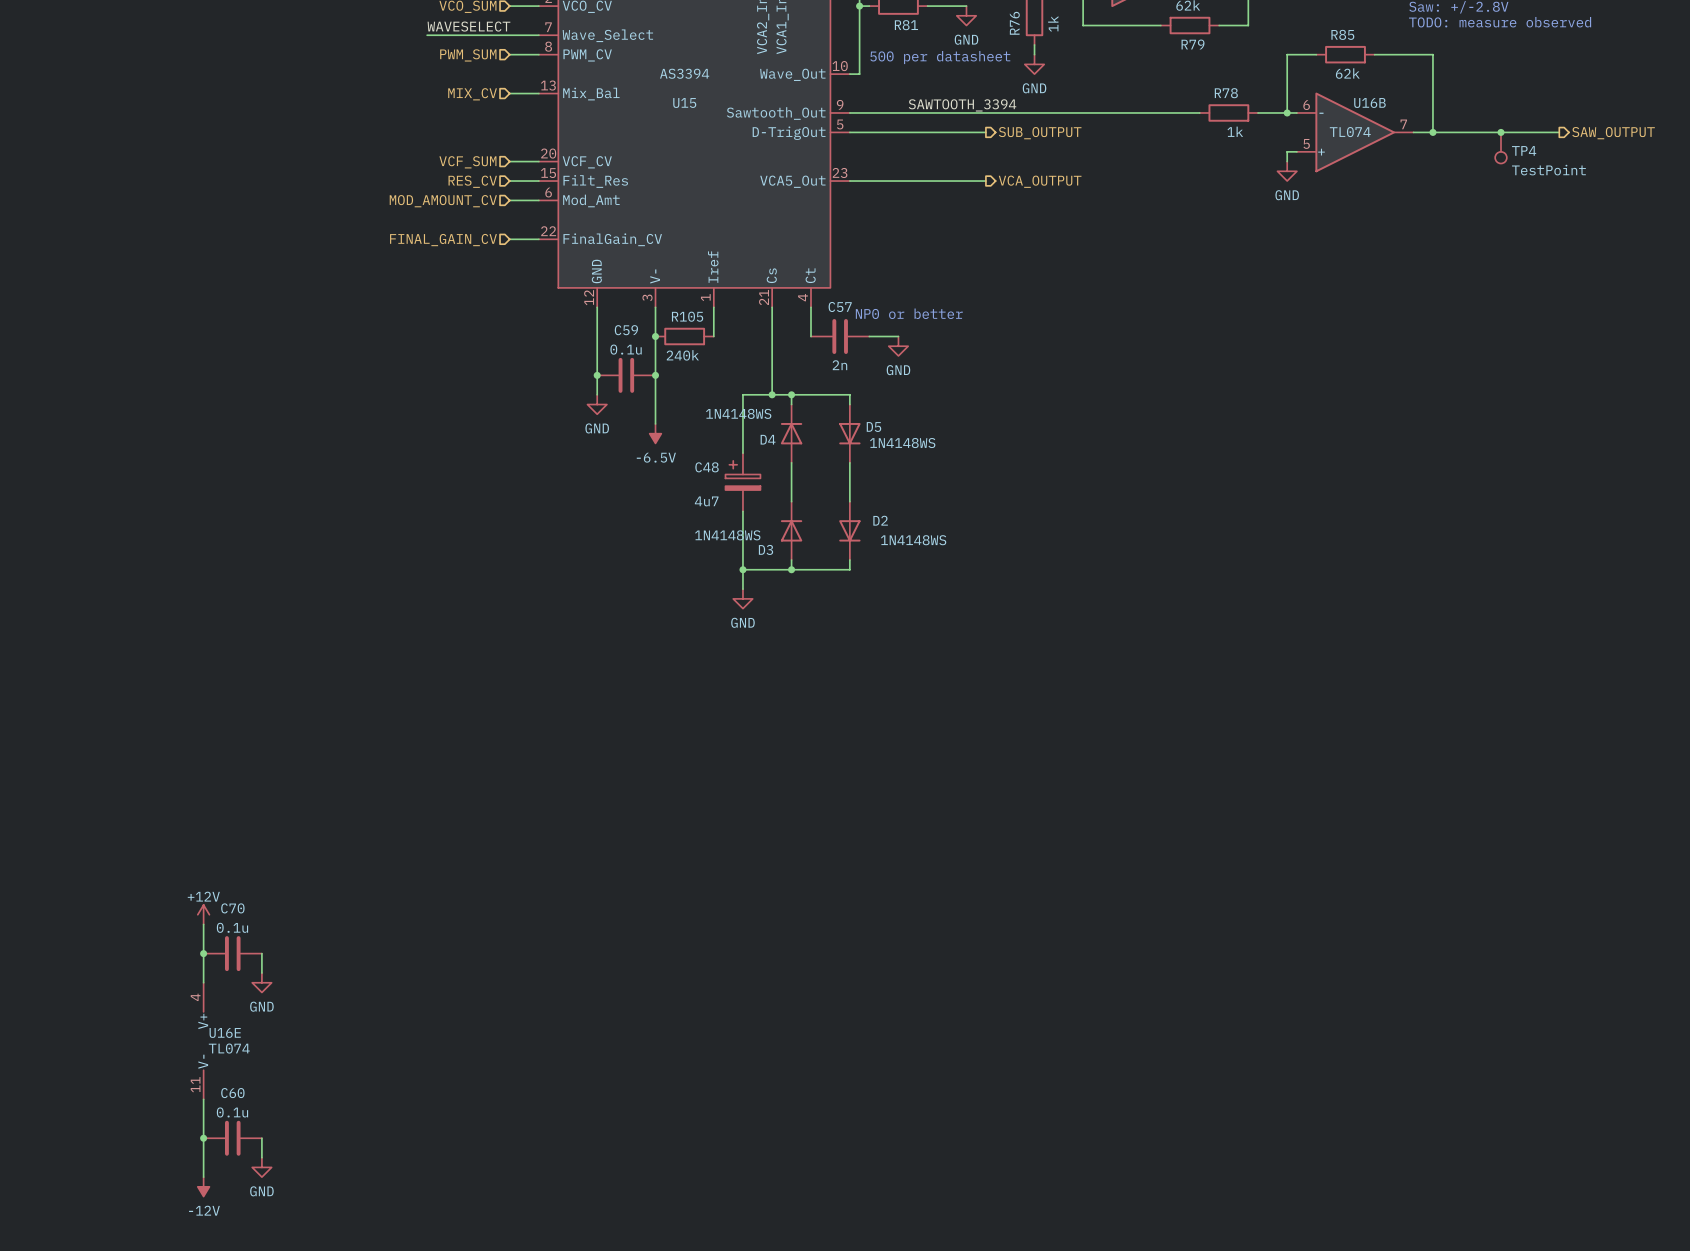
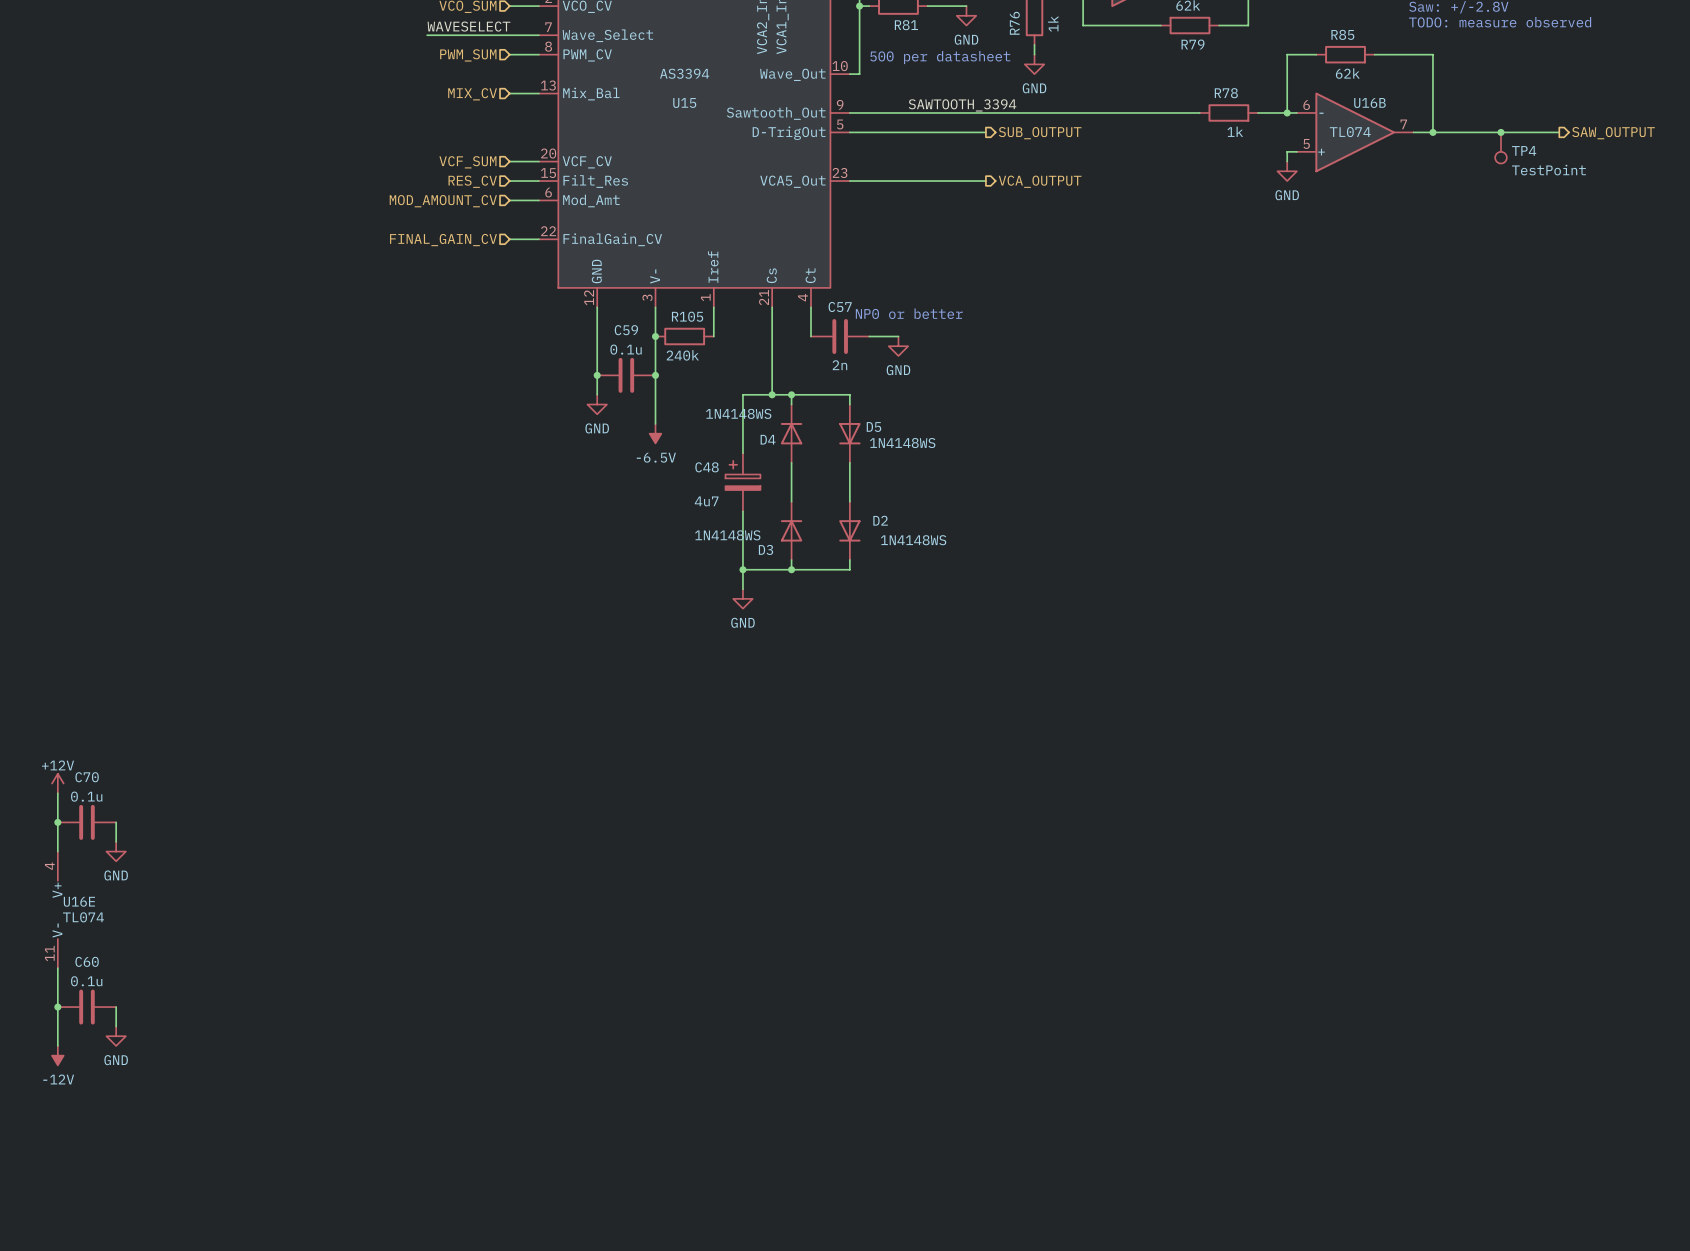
power symbol: none -> +12V (57, 783)
wire: none -> (57, 793) (57, 851)
junction: none -> (57, 822)
wire: none -> (116, 822) (116, 841)
power symbol: none -> GND (116, 851)
power symbol: +12V (203, 914) -> none
wire: (203, 924) (203, 982) -> none
junction: (203, 953) -> none
C70 position: (232, 953) -> (86, 822)
wire: (261, 953) (261, 973) -> (116, 1007) (116, 1026)
wire: none -> (57, 968) (57, 1045)
power symbol: GND (261, 982) -> none
junction: none -> (57, 1007)
power symbol: none -> GND (116, 1036)
U16E position: (203, 1041) -> (57, 909)
power symbol: none -> -12V (57, 1055)
wire: (203, 1099) (203, 1177) -> none
junction: (203, 1138) -> none
C60 position: (232, 1138) -> (86, 1007)
wire: (261, 1138) (261, 1157) -> none
power symbol: GND (261, 1167) -> none
power symbol: -12V (203, 1186) -> none

